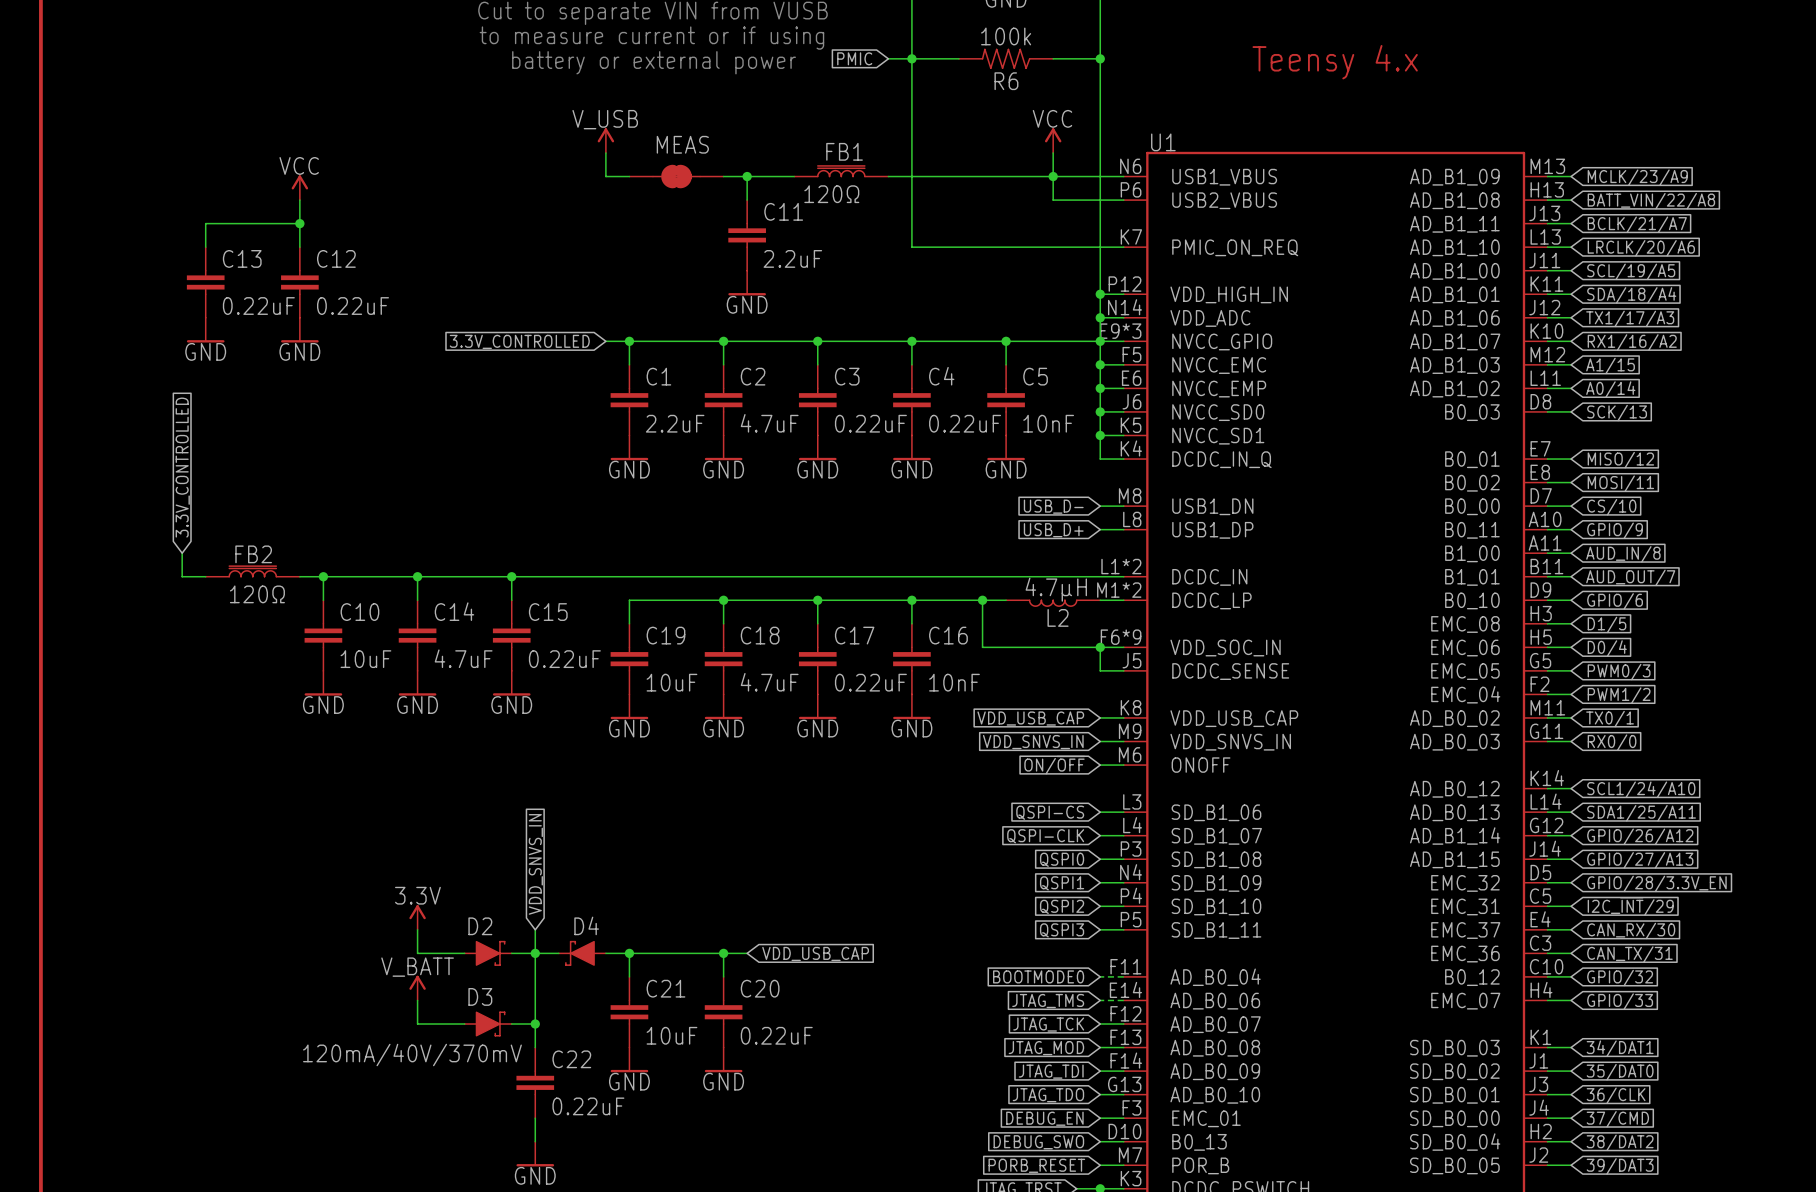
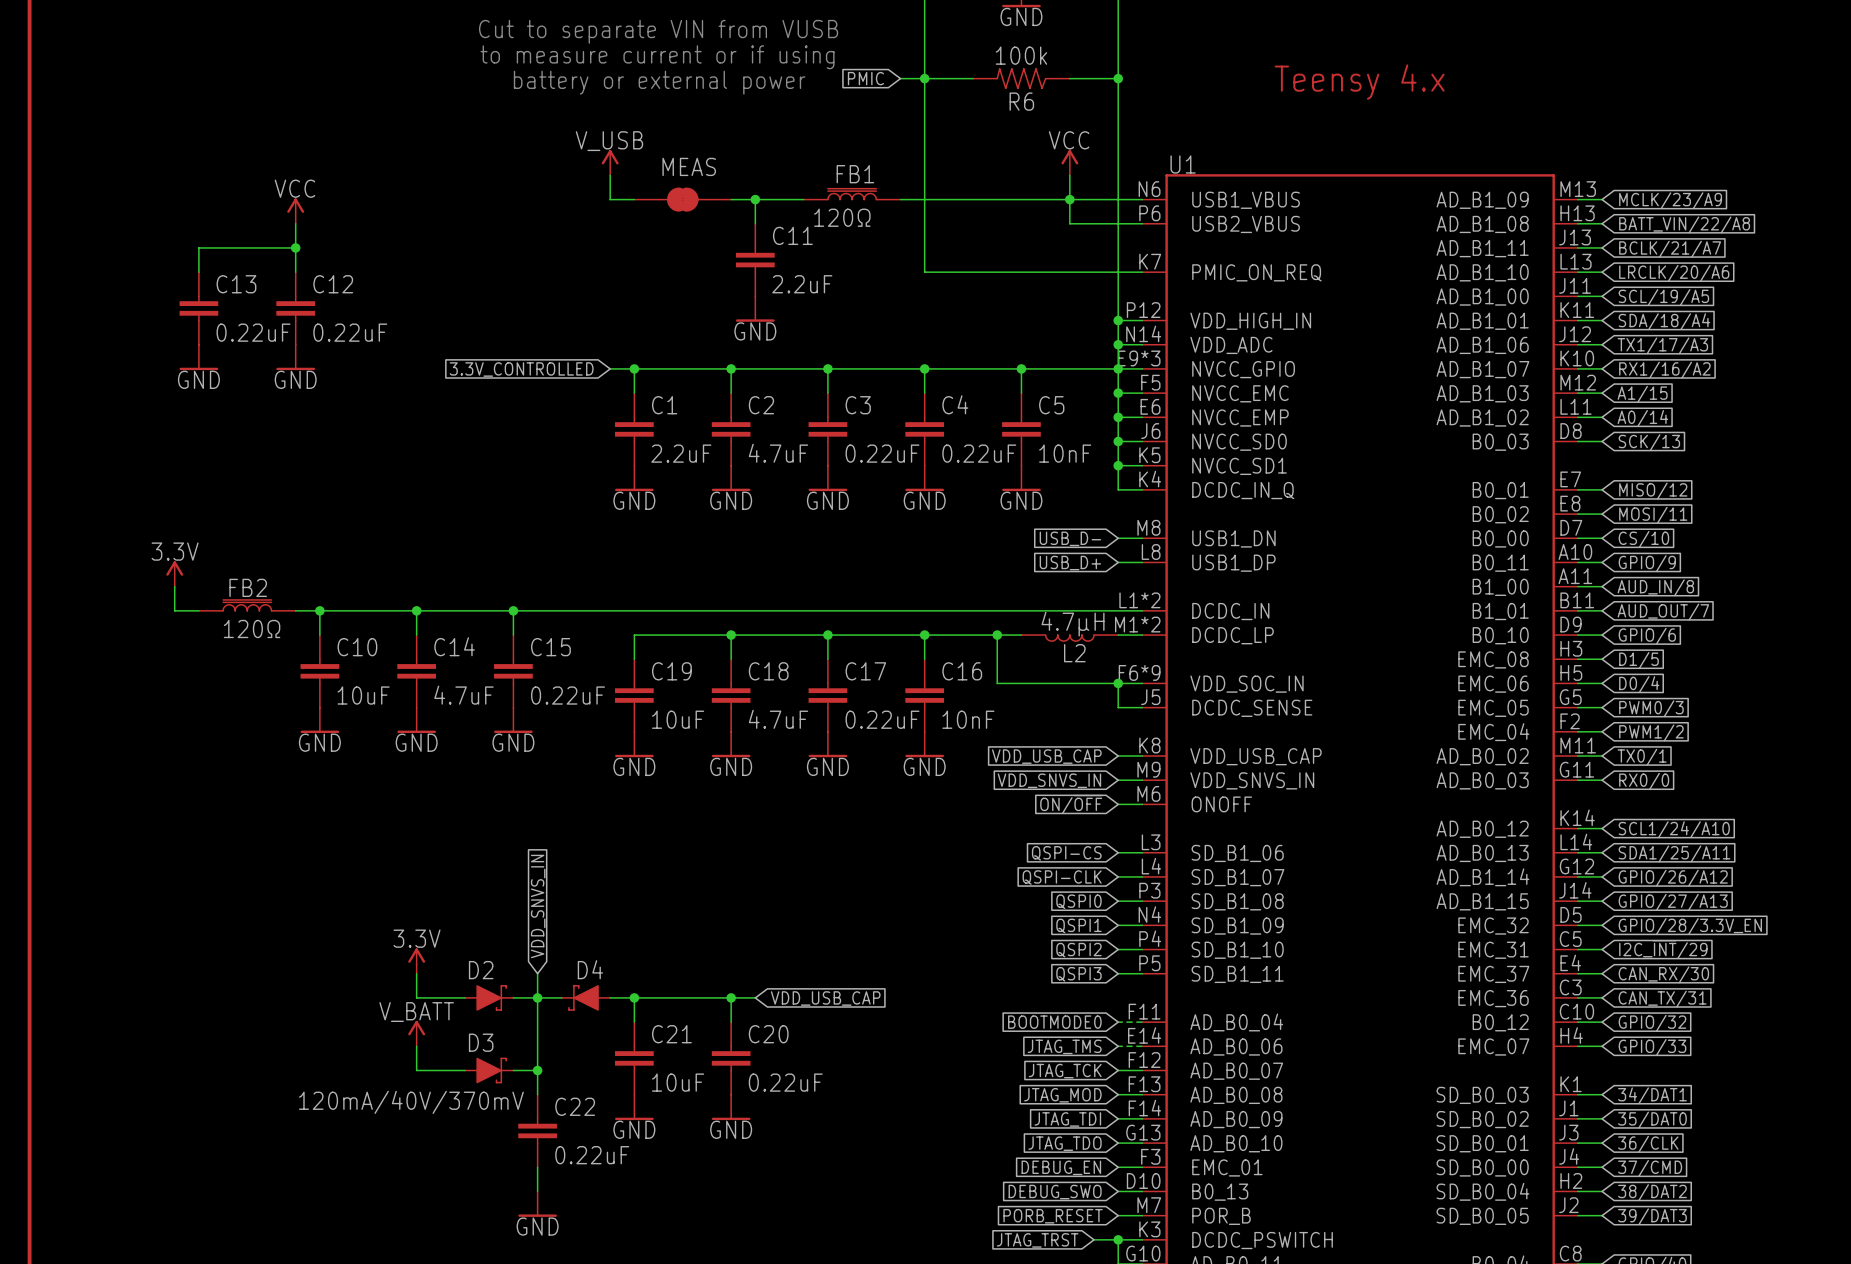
global label: 3.3V_CONTROLLED (182, 467) -> none
power symbol: none -> 3.3V (174, 573)

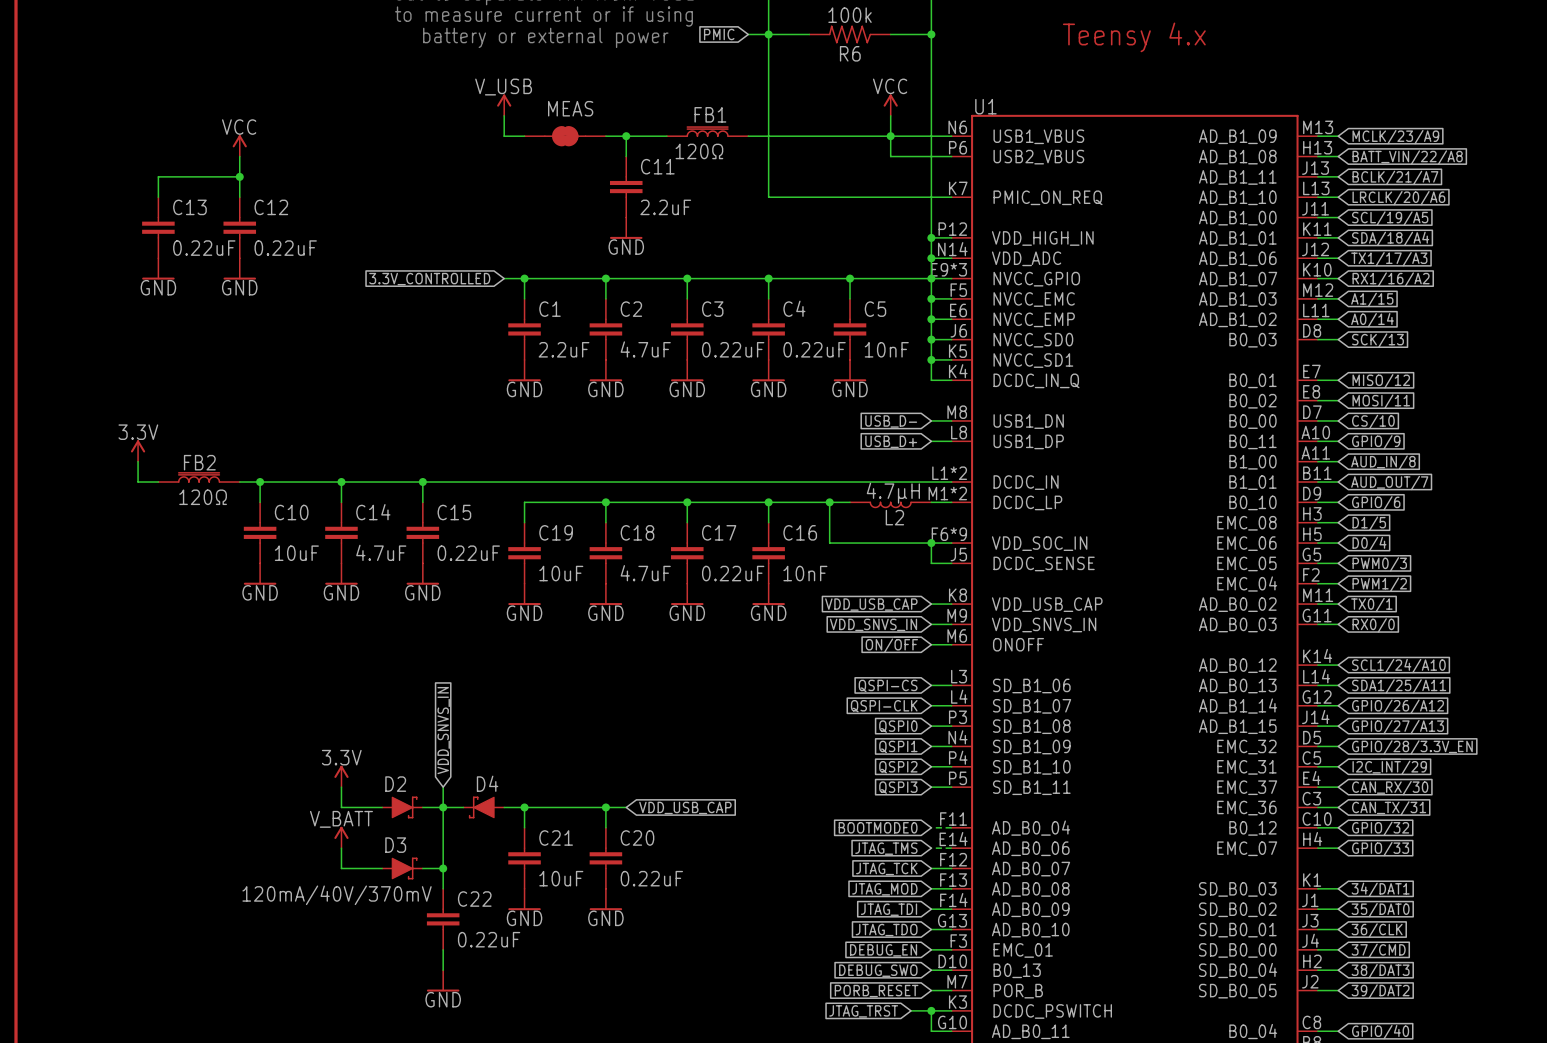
global label: 38/DAT2 (1652, 1192) -> 38/DAT3 (1380, 971)
global label: 39/DAT3 (1652, 1216) -> 39/DAT2 (1380, 991)

